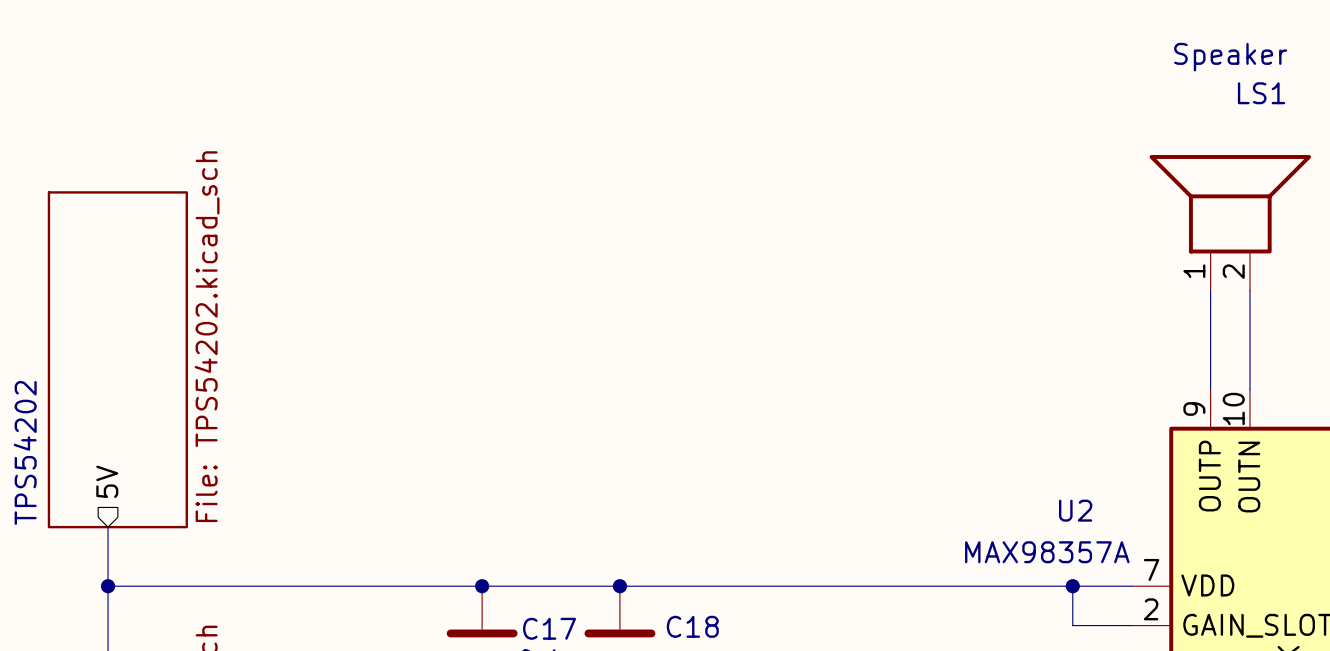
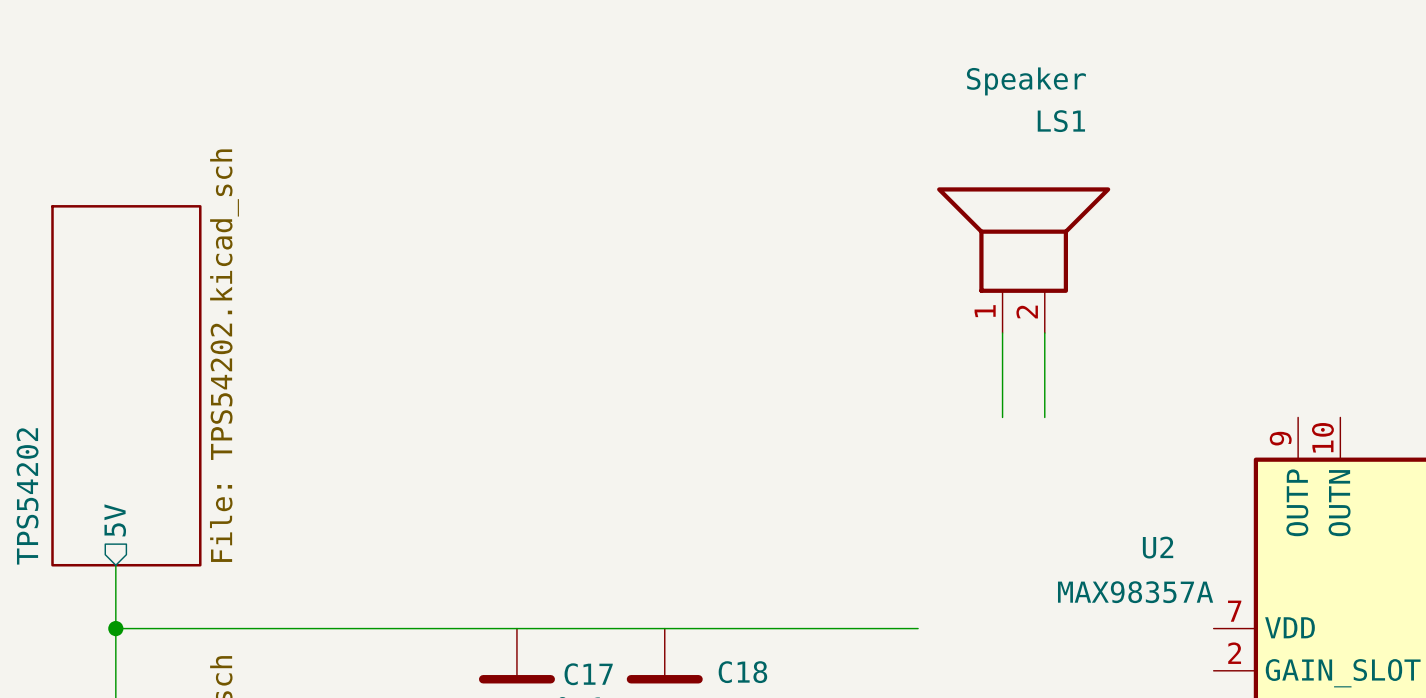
LS1 position: (1230, 222) -> (1023, 260)
wire: (1210, 290) (1210, 389) -> none
wire: (1249, 290) (1249, 389) -> none
wire: none -> (1002, 333) (1002, 417)
wire: none -> (1044, 333) (1044, 417)
junction: (482, 586) -> none
junction: (619, 586) -> none
wire: (856, 586) (1131, 586) -> none
wire: (1072, 586) (1072, 625) (1131, 625) -> none
junction: (1072, 586) -> none

